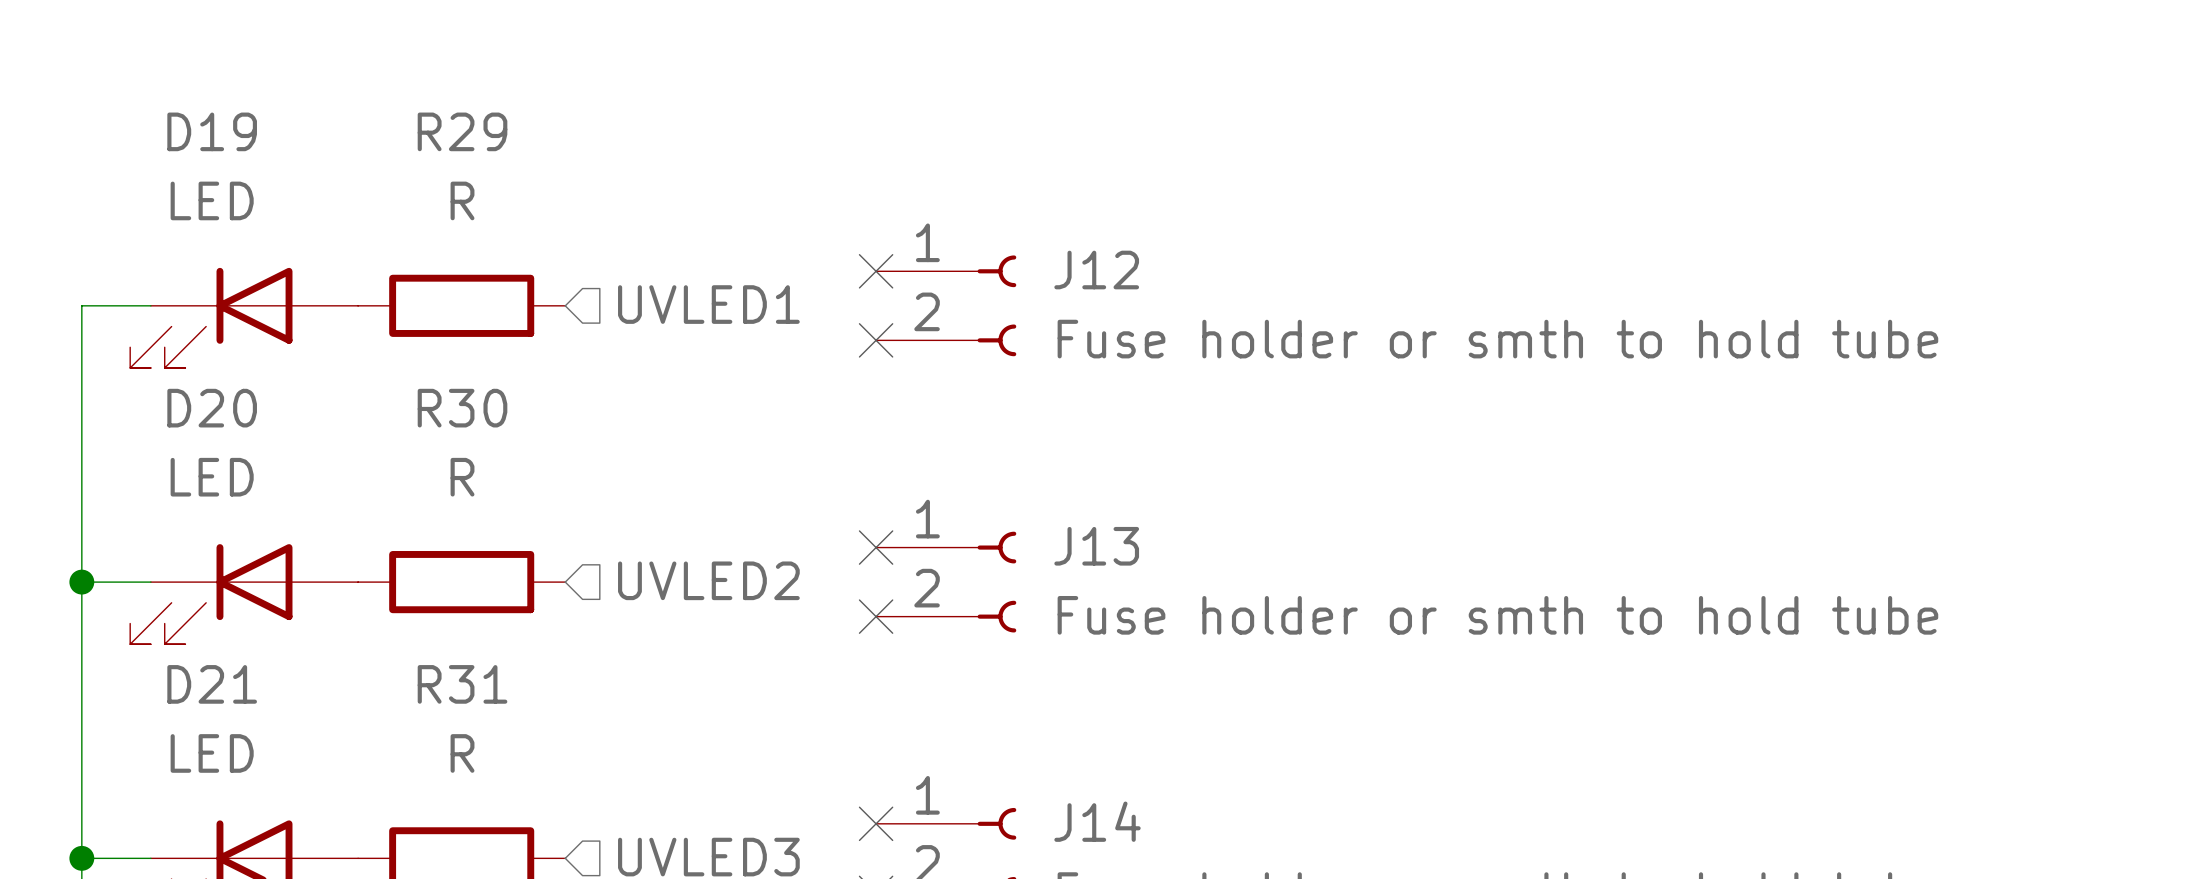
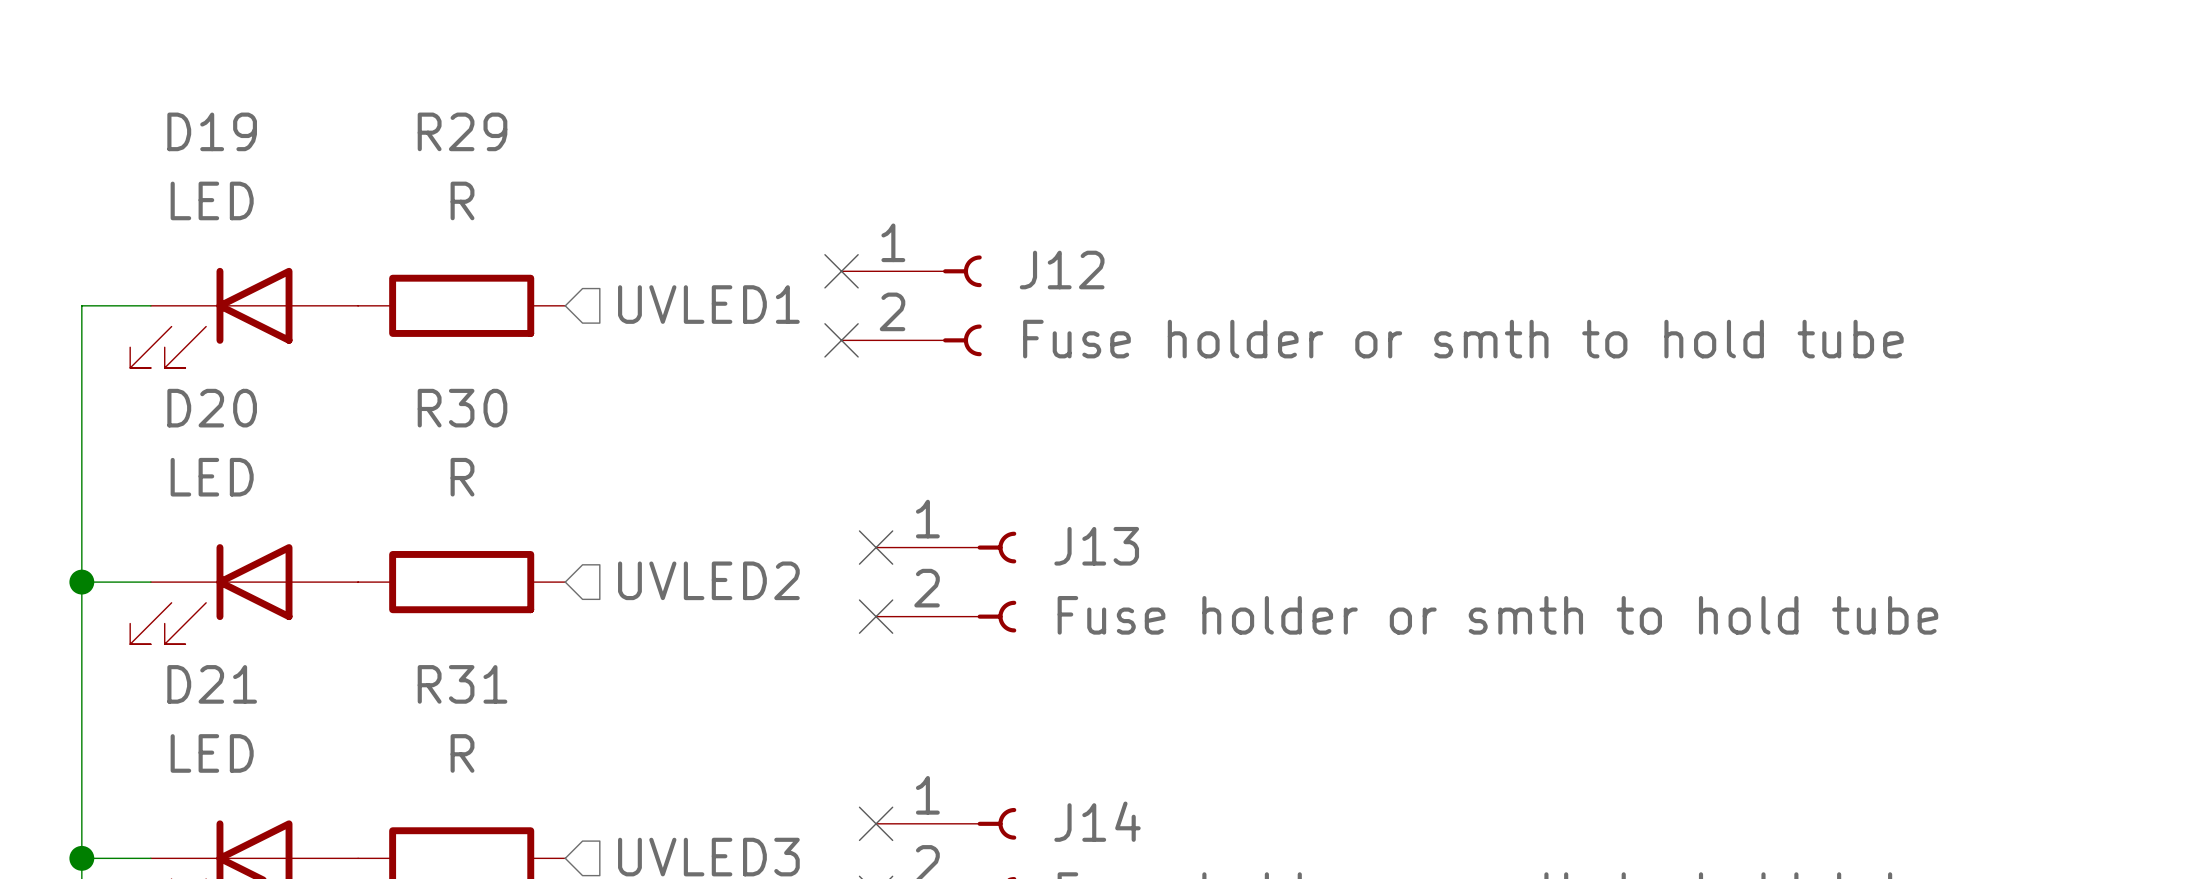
no-connect mark position: (876, 271) -> (841, 271)
J12 position: (946, 305) -> (911, 305)
no-connect mark position: (876, 340) -> (841, 340)

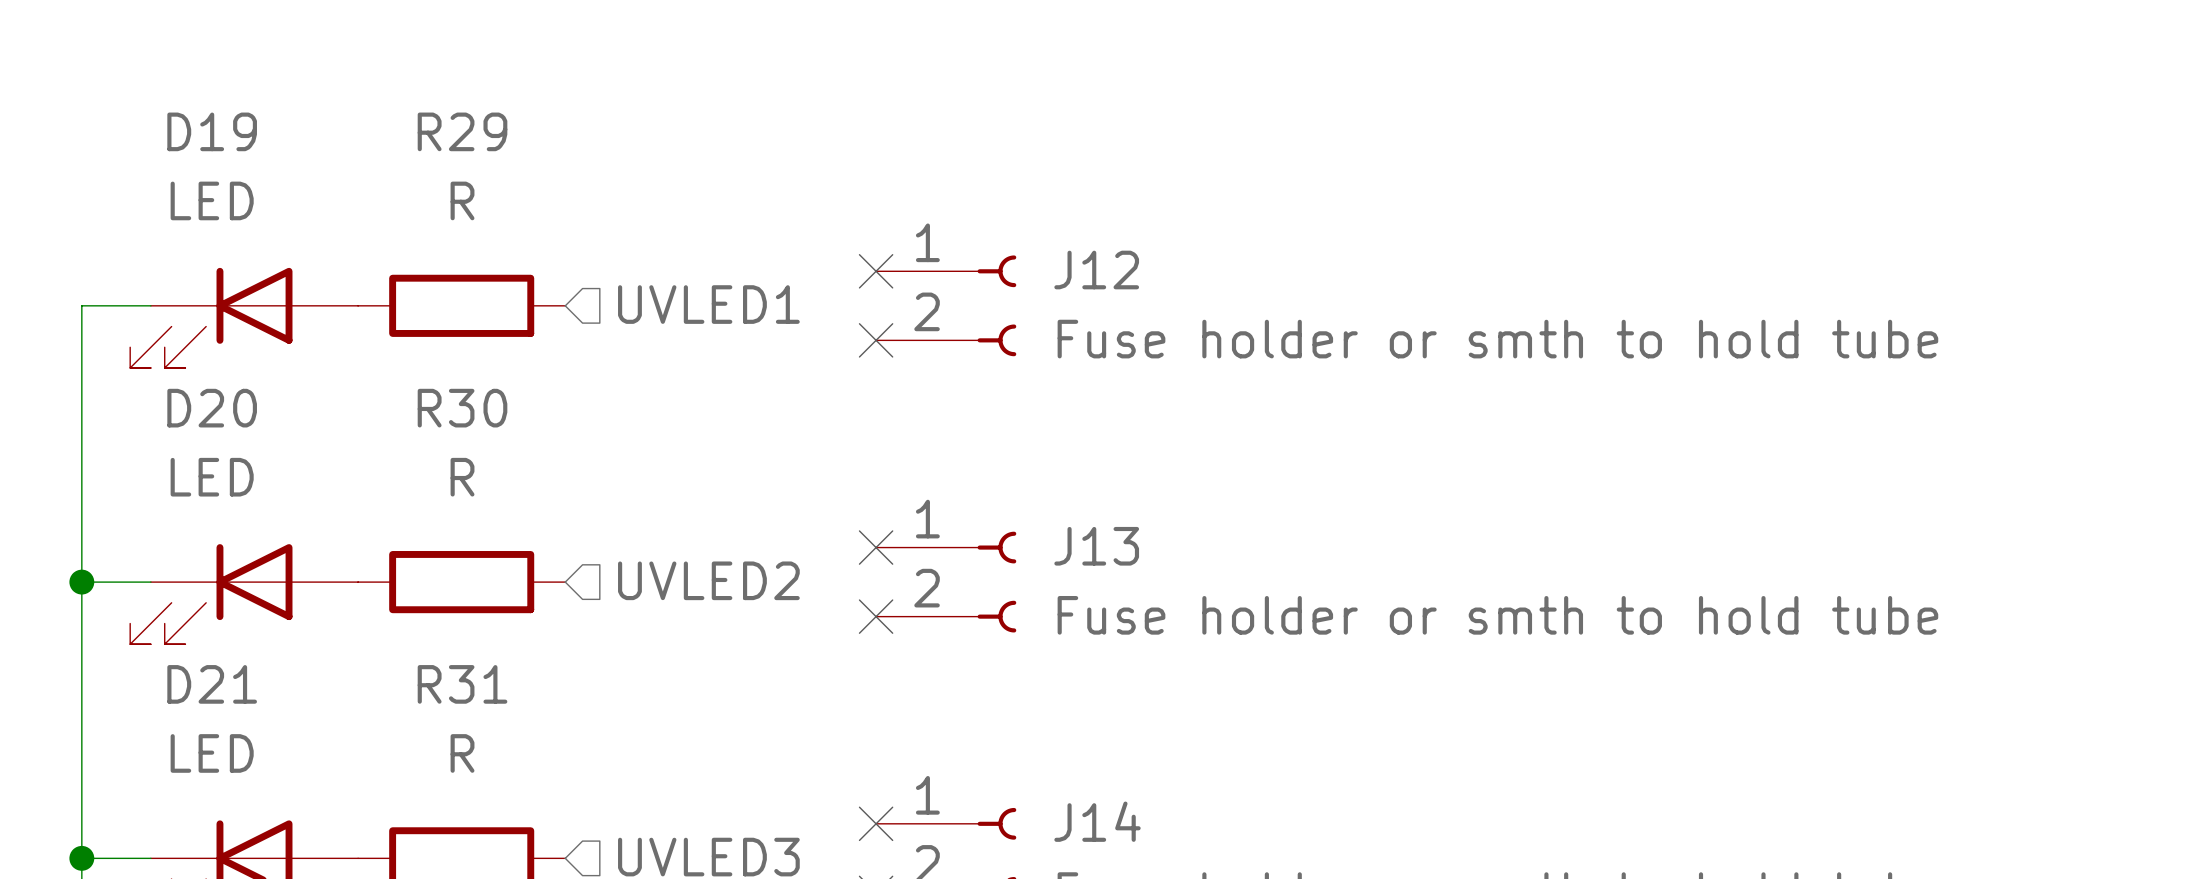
no-connect mark position: (841, 271) -> (876, 271)
J12 position: (911, 305) -> (946, 305)
no-connect mark position: (841, 340) -> (876, 340)

